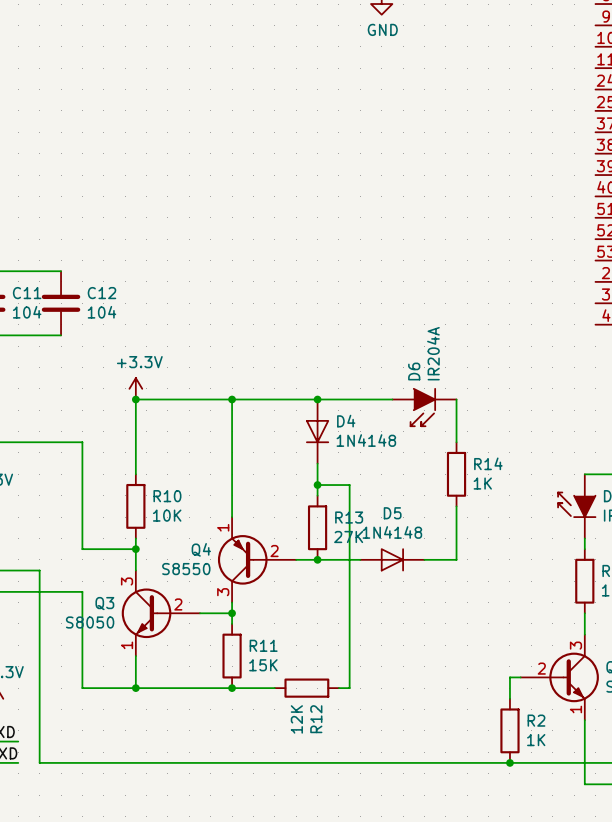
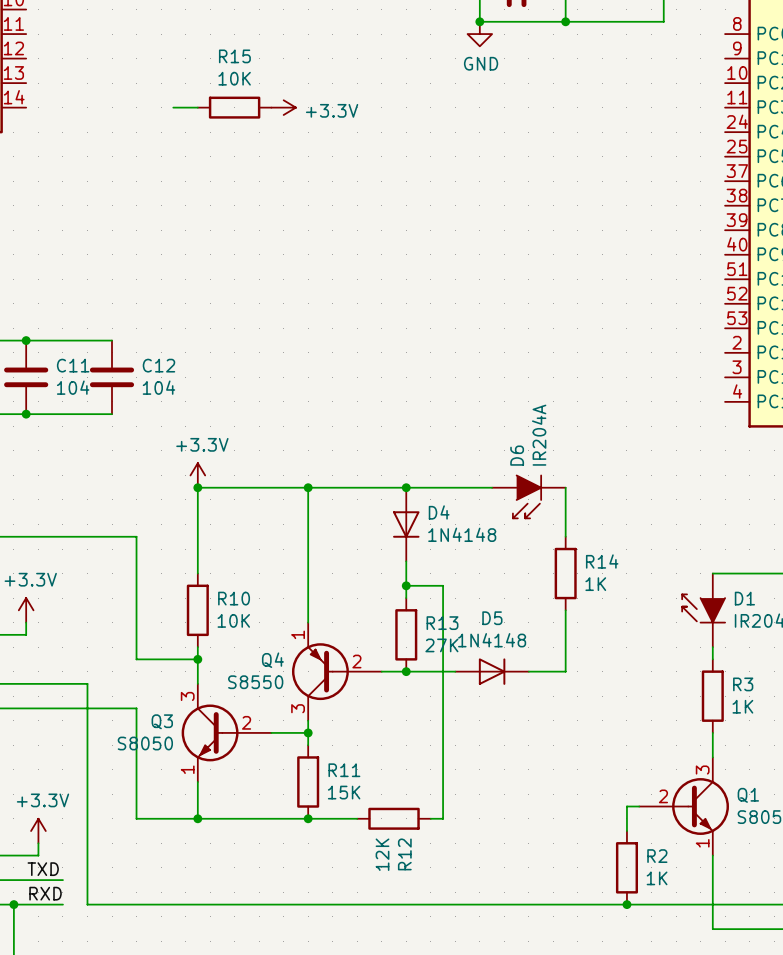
wire: none -> (173, 107) (197, 107)
R15: none -> 10K (234, 107)
power symbol: none -> +3.3V (283, 107)

